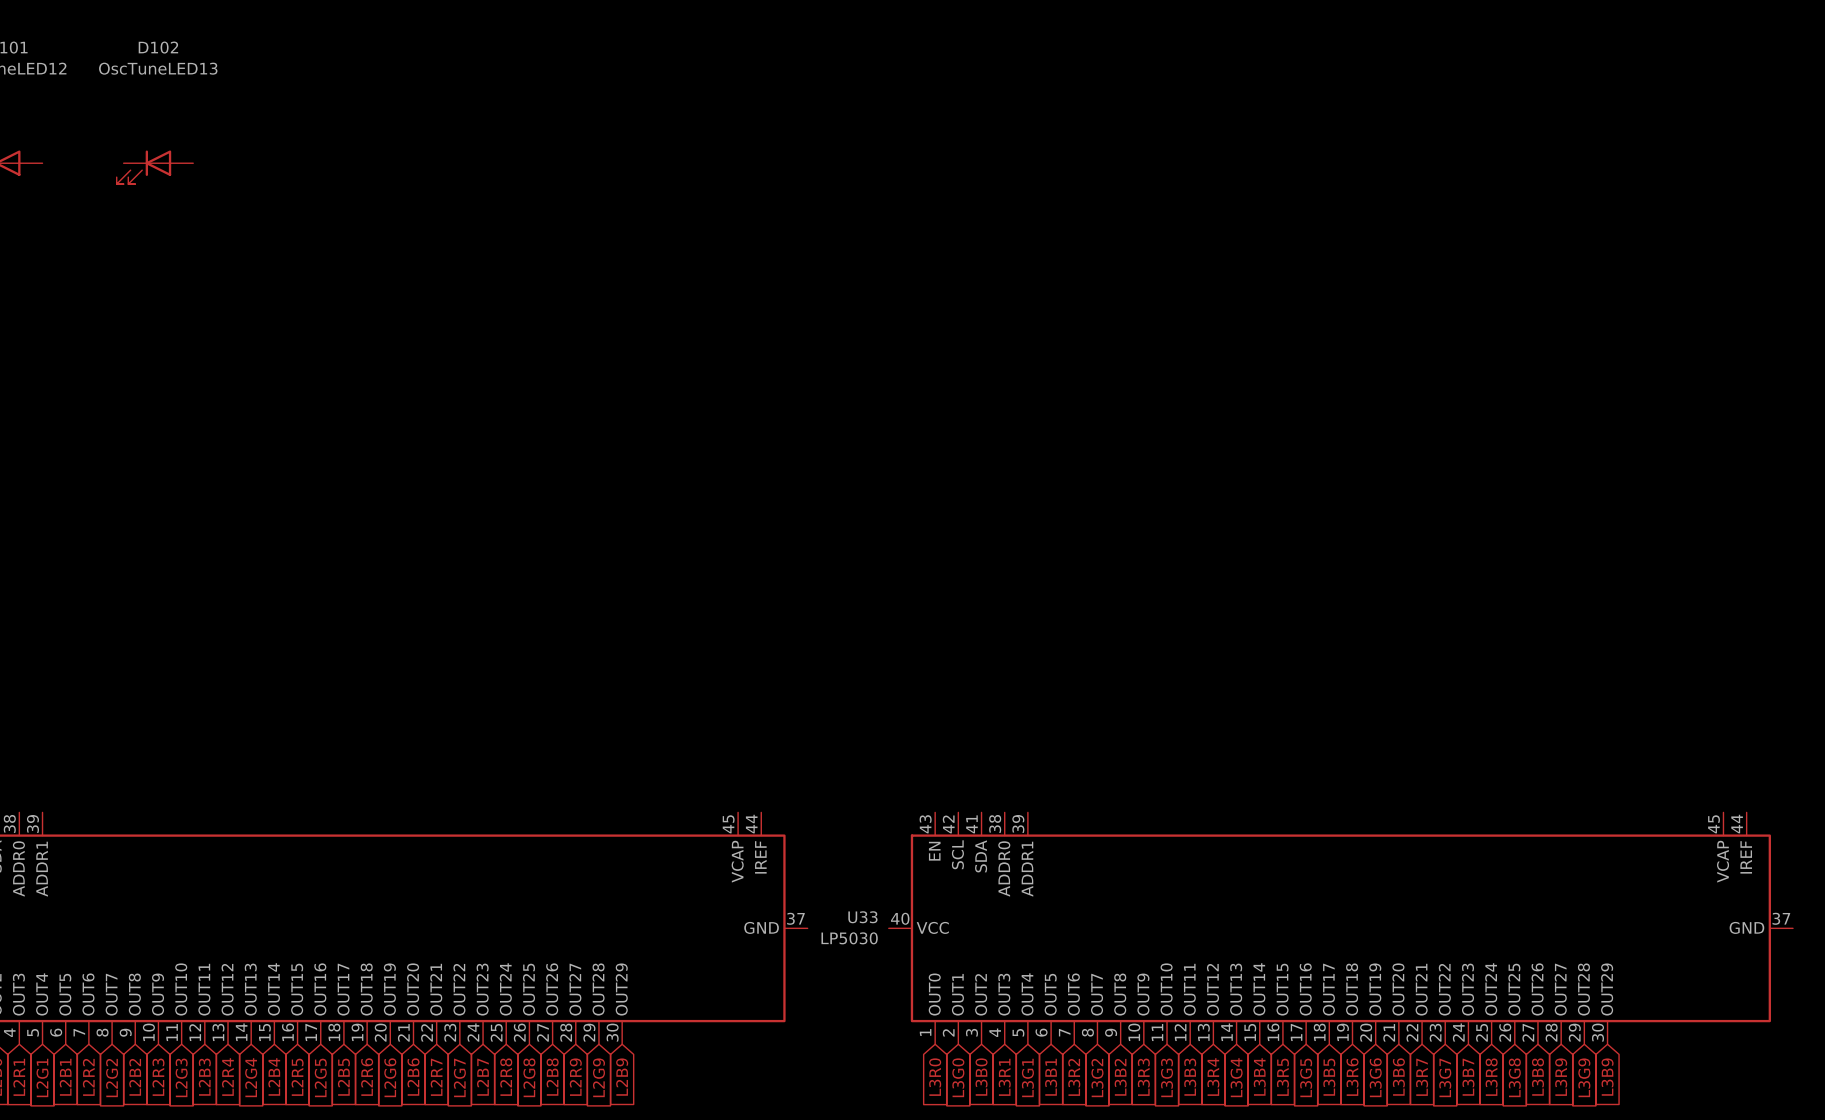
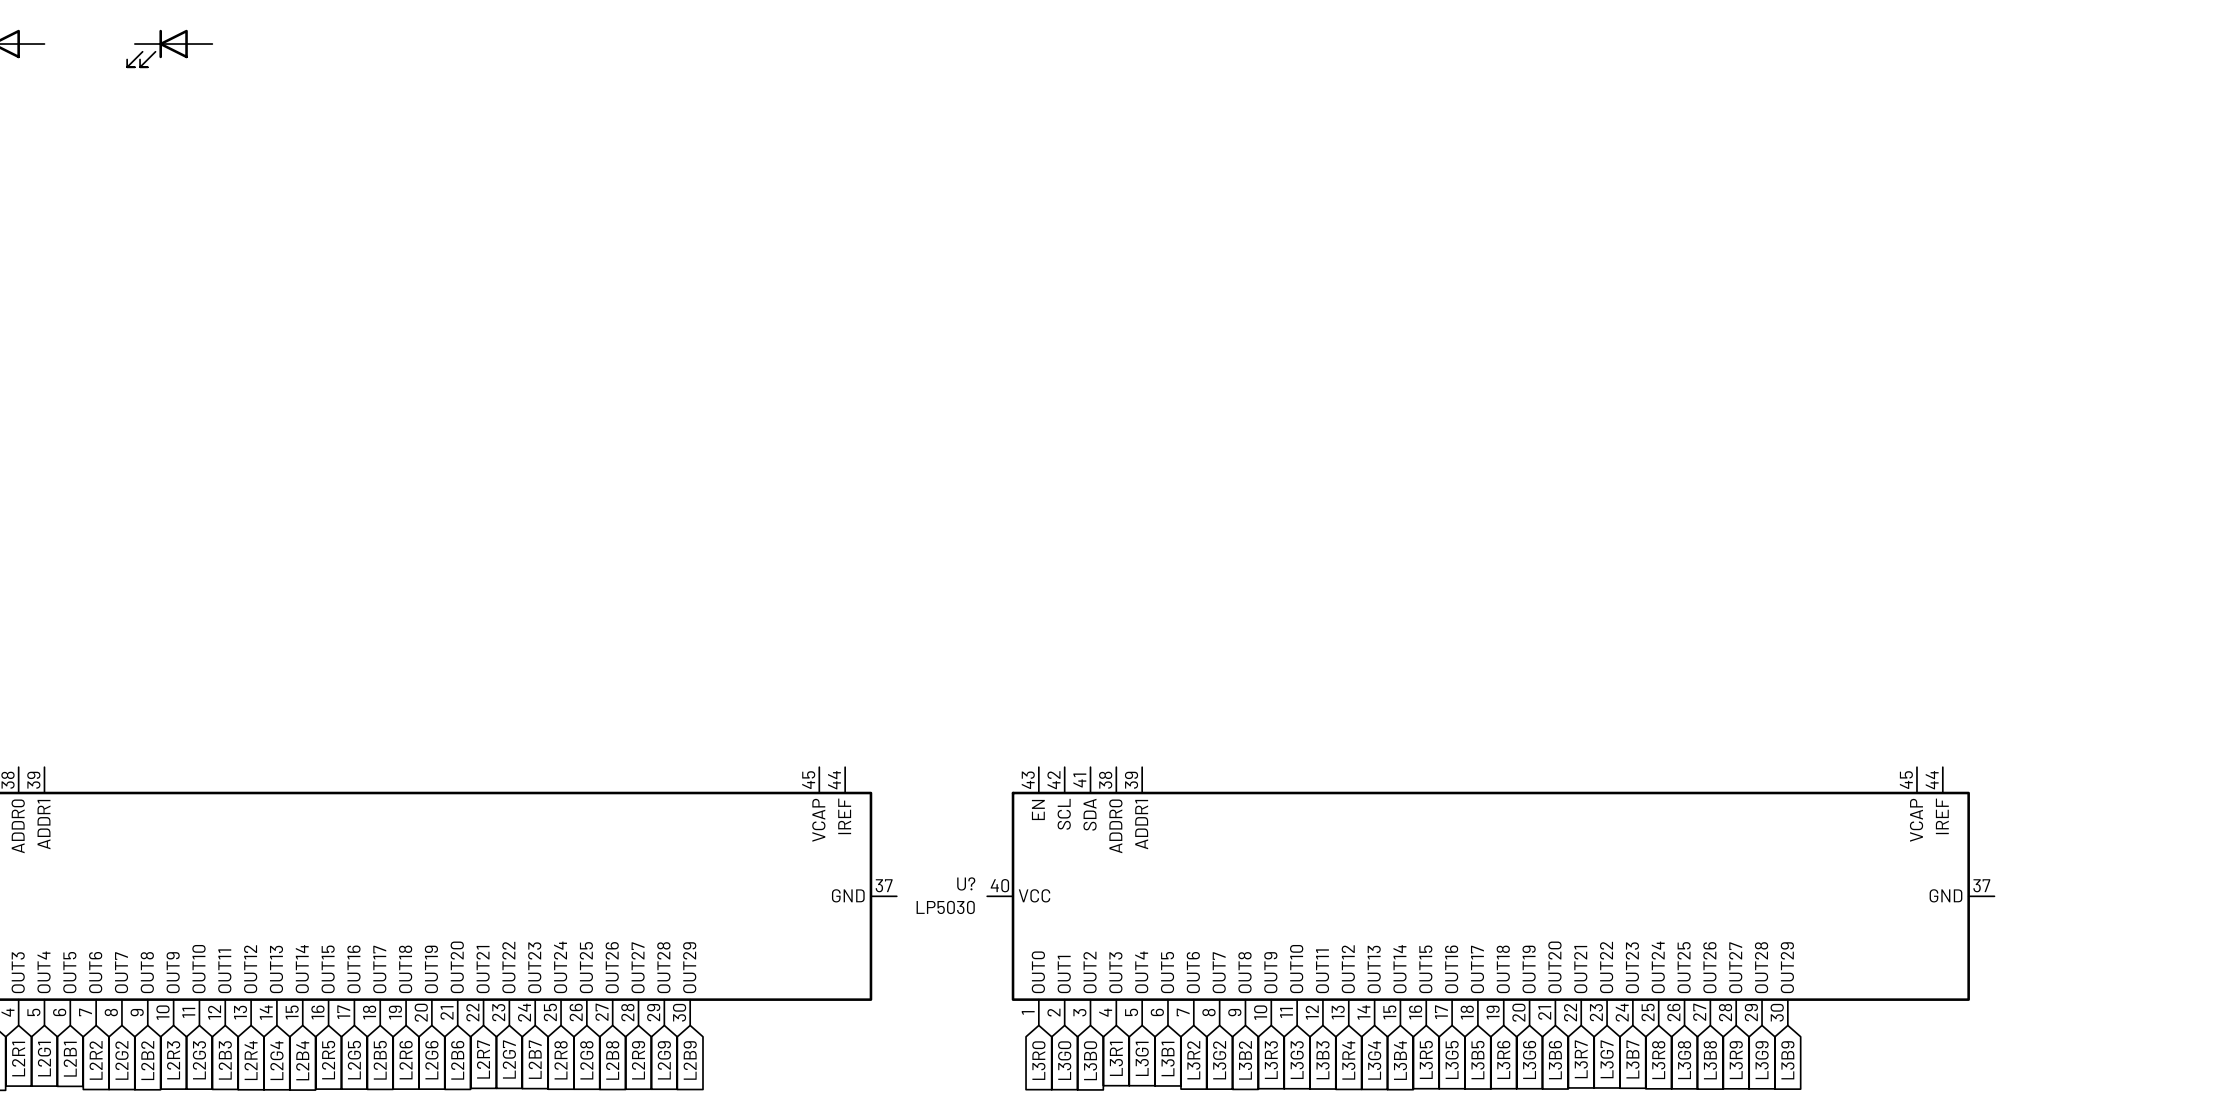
U33 name: U33 (862, 917) -> U? (966, 883)

